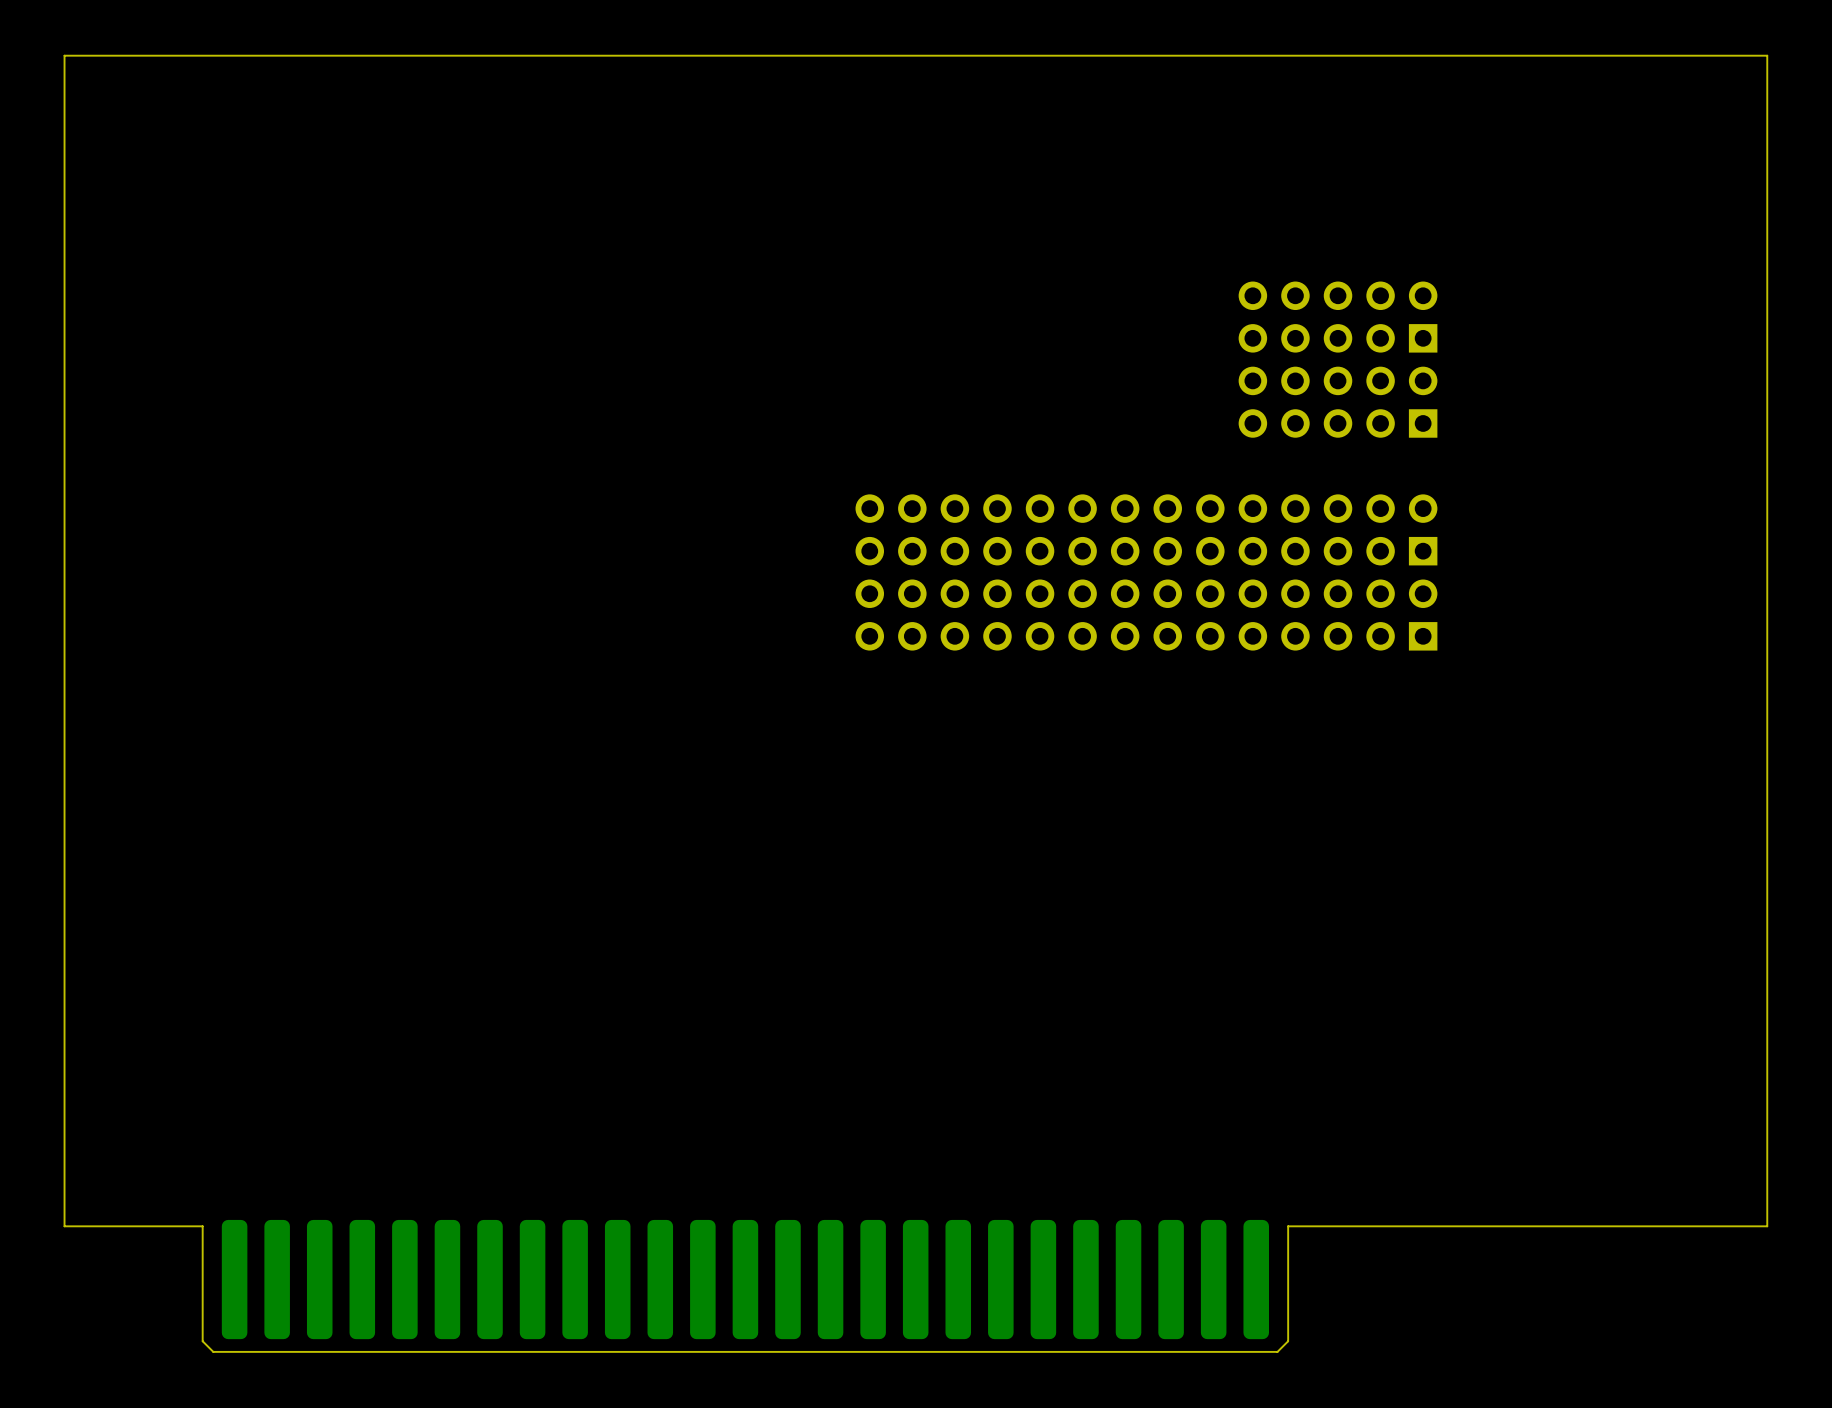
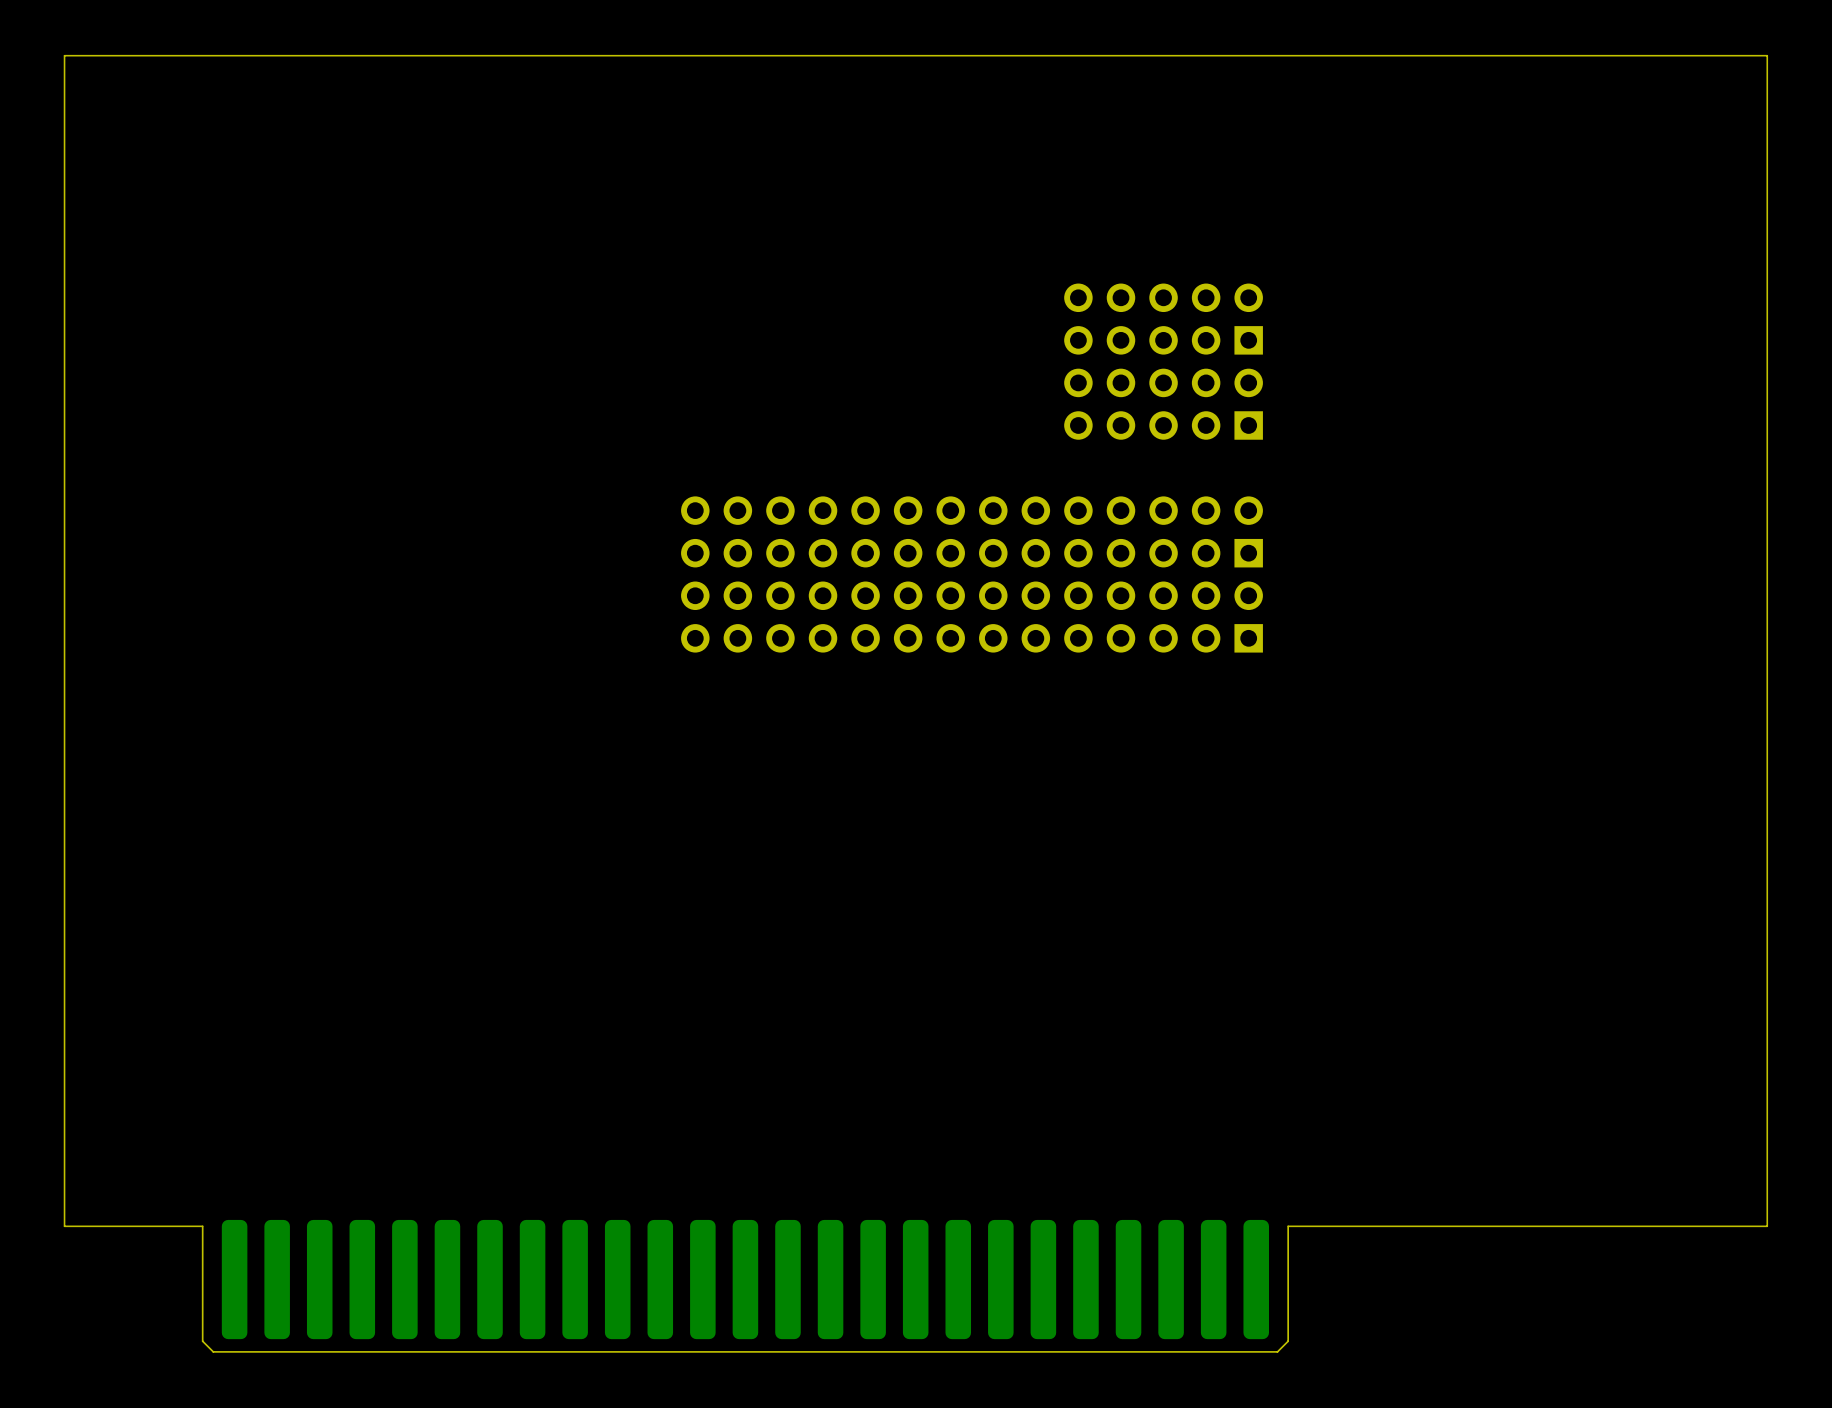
part: (1338, 317) -> none
part: none -> (1163, 319)
part: (1338, 402) -> none
part: none -> (1163, 404)
part: (1146, 529) -> none
part: none -> (971, 531)
part: (1146, 615) -> none
part: none -> (971, 617)

